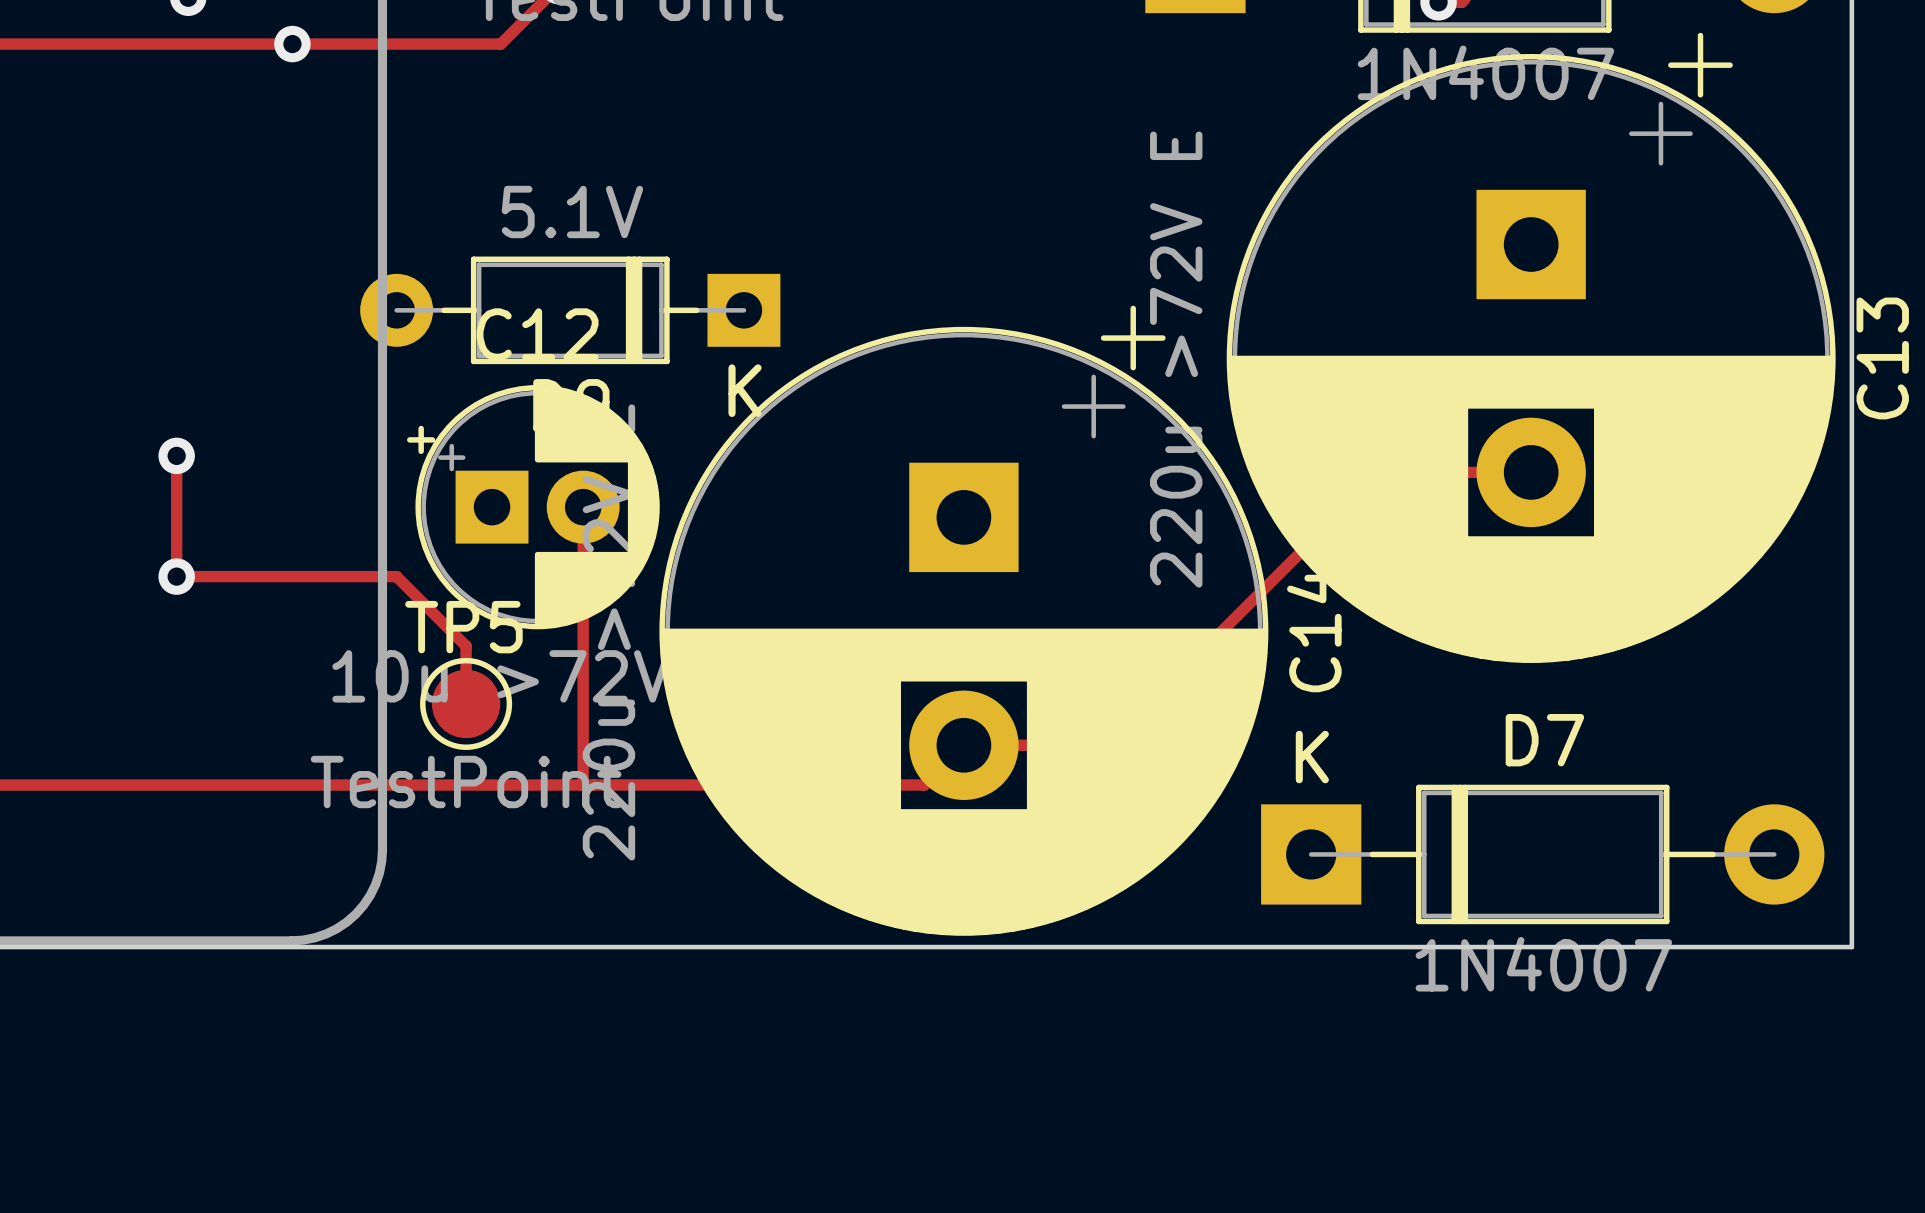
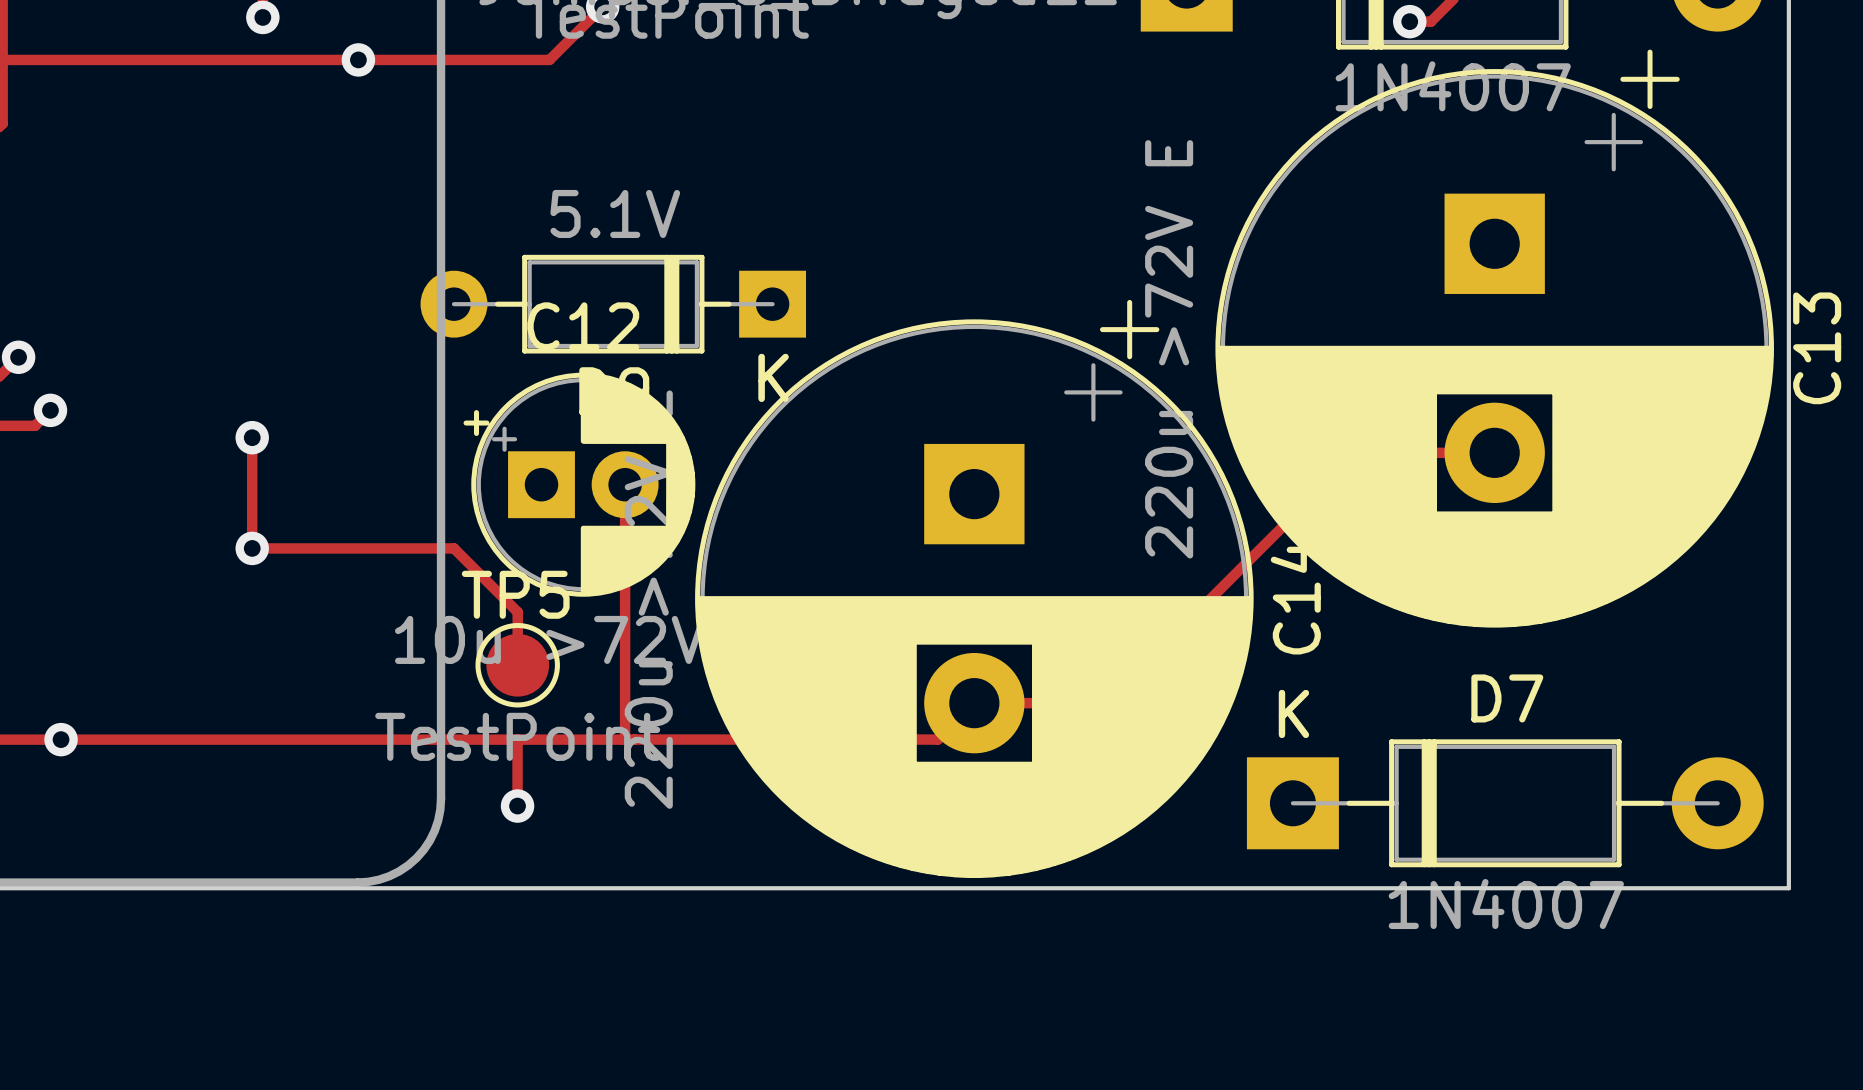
track: none -> (517, 739) (517, 806)
via: none -> (517, 806)

